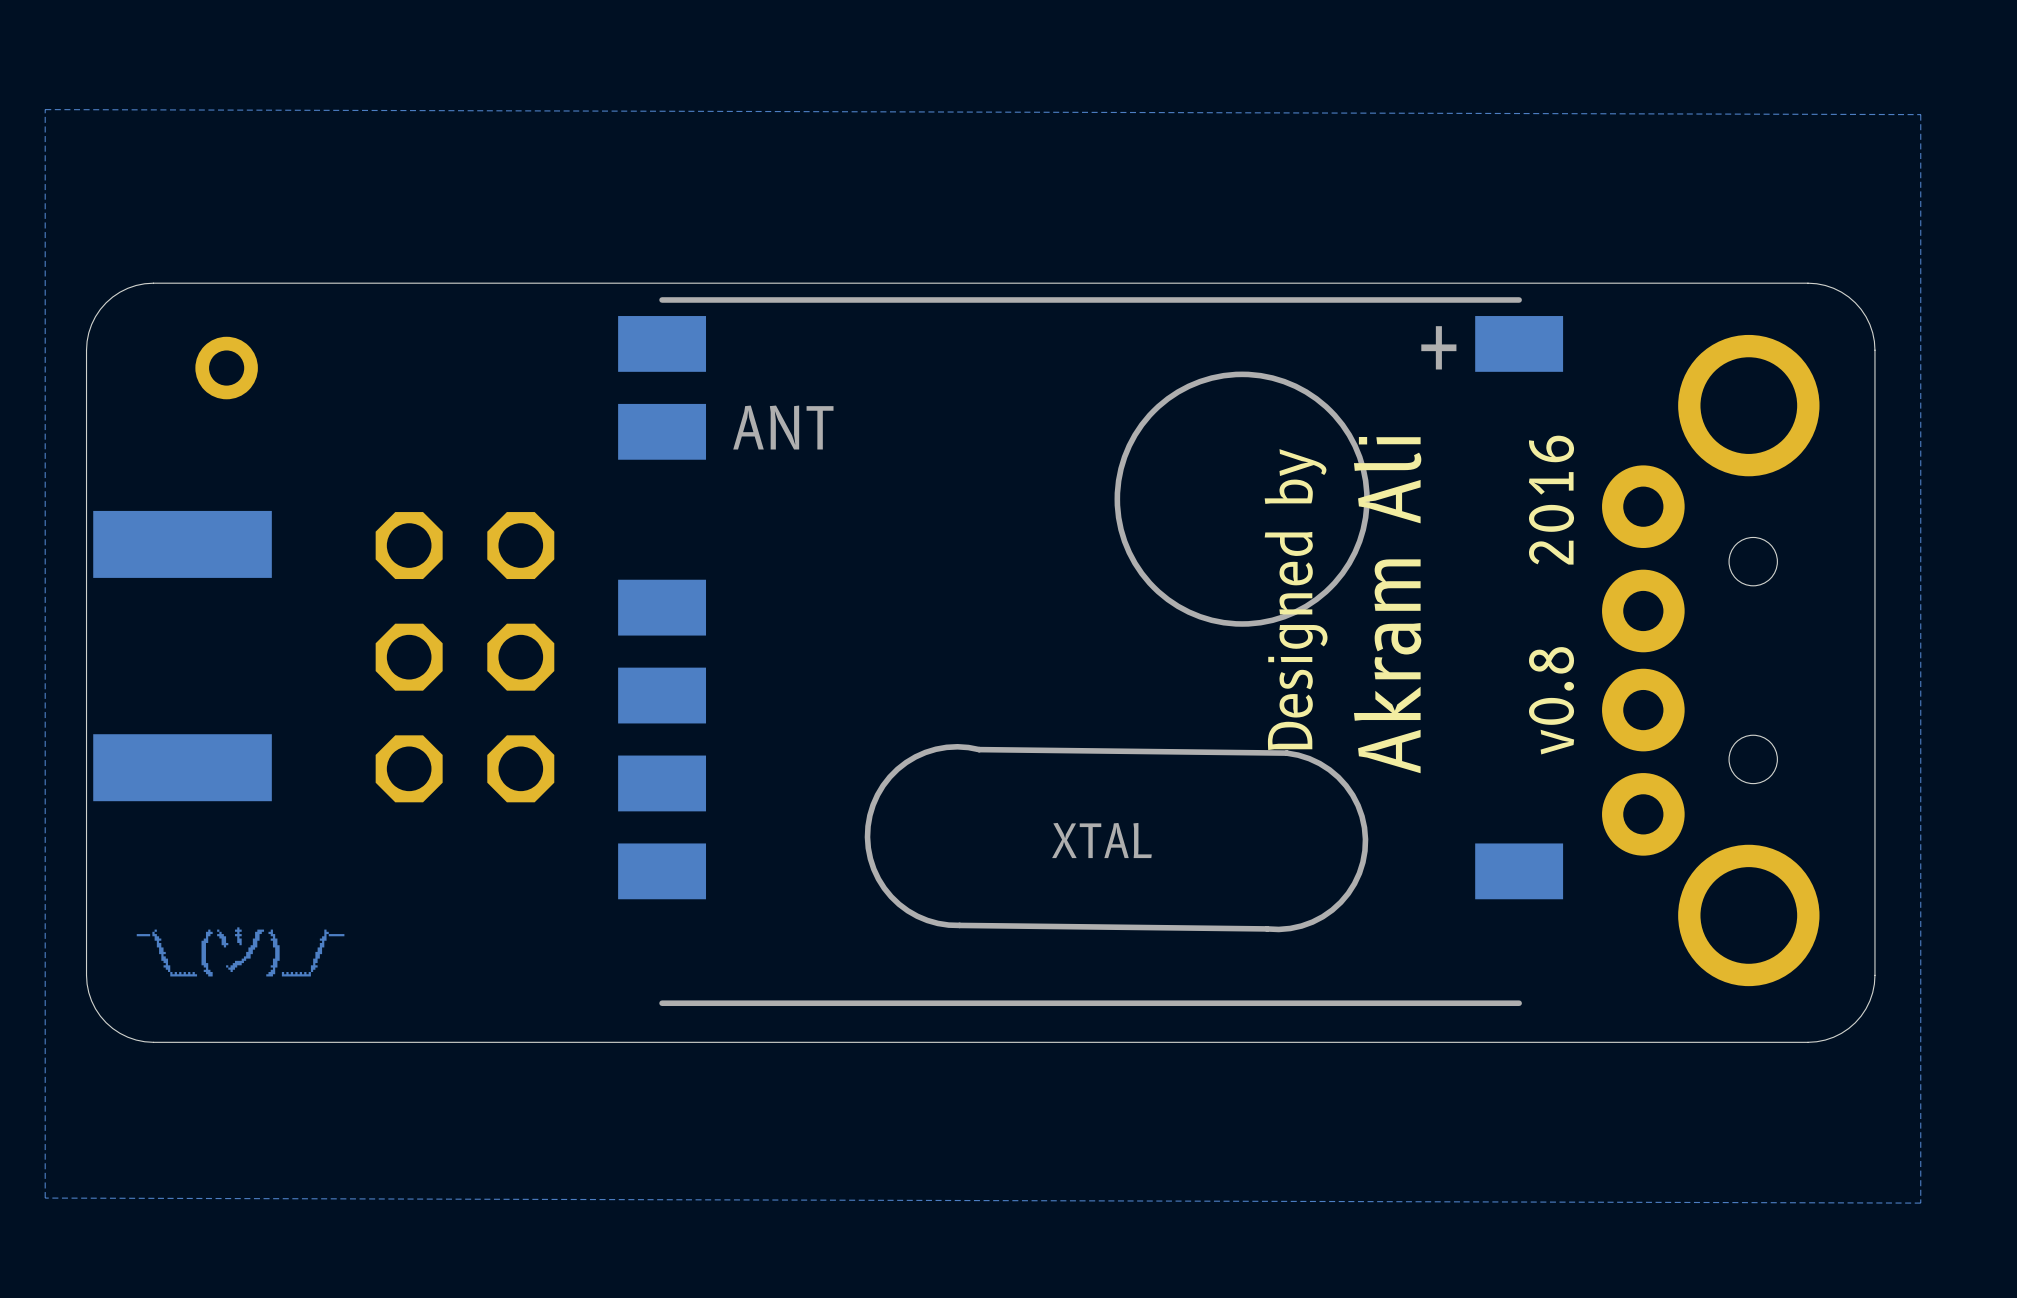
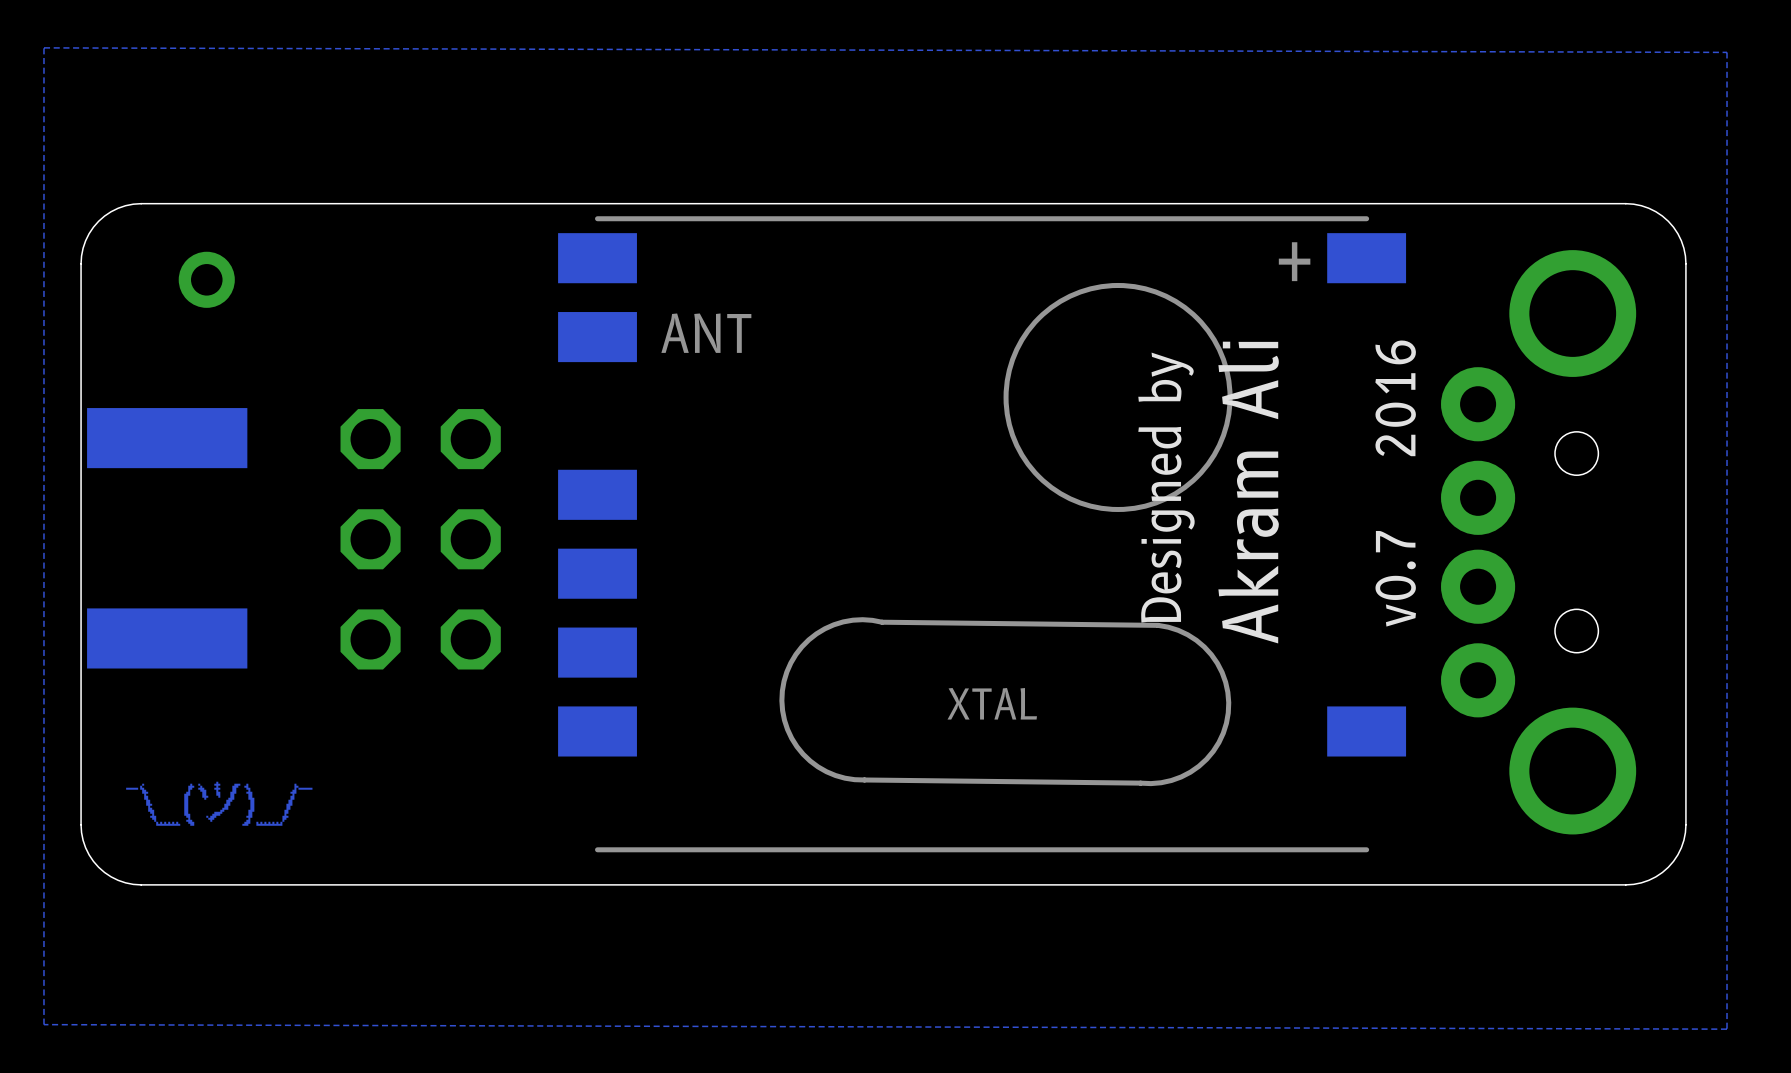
text: v0.8 2016 (1551, 595) -> v0.7 2016 (1395, 483)

